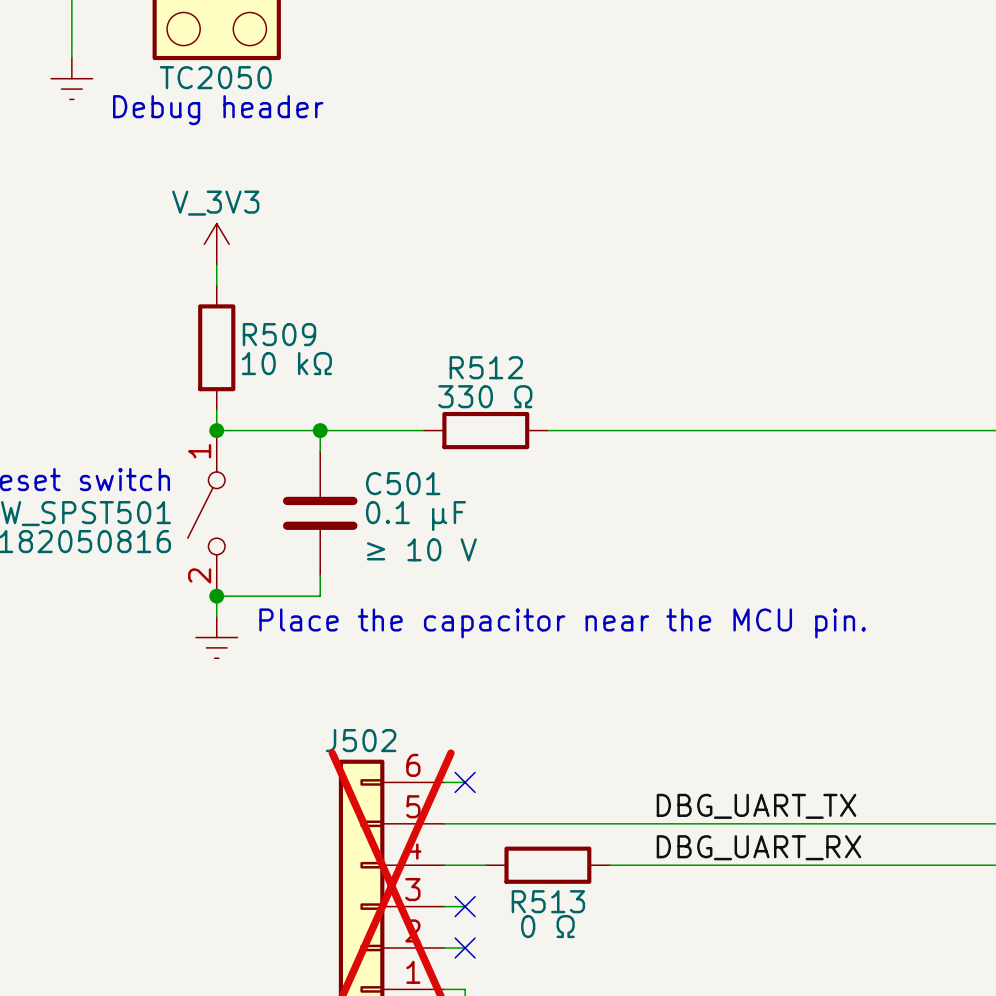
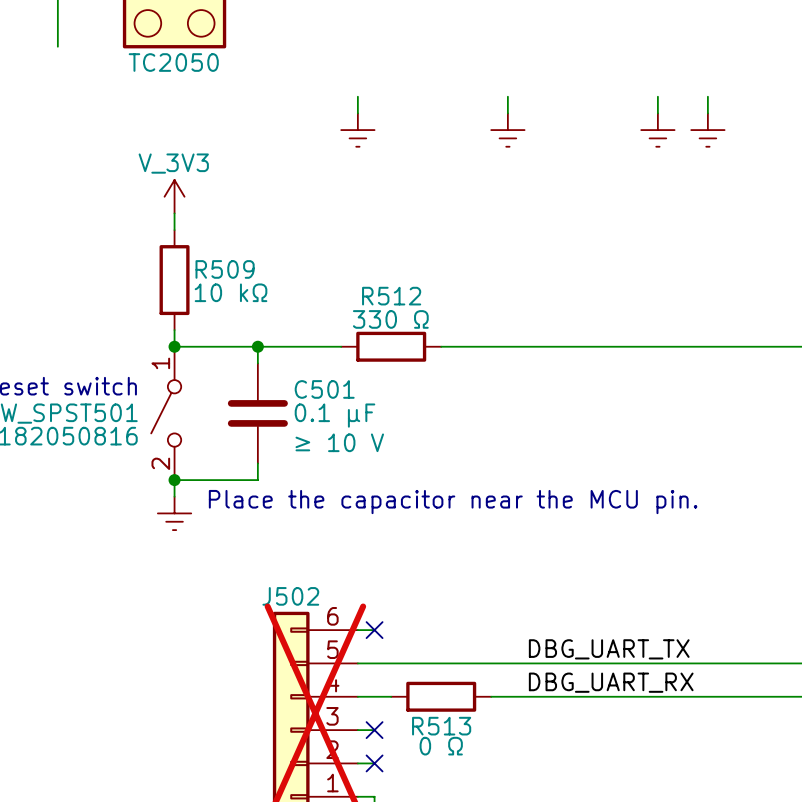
power symbol: (71, 78) -> none
text: Debug header (218, 110) -> none
wire: none -> (357, 96) (357, 113)
wire: none -> (507, 96) (507, 113)
wire: none -> (657, 96) (657, 113)
wire: none -> (707, 96) (707, 113)
power symbol: none -> (357, 130)
power symbol: none -> (507, 130)
power symbol: none -> (657, 130)
power symbol: none -> (707, 130)

